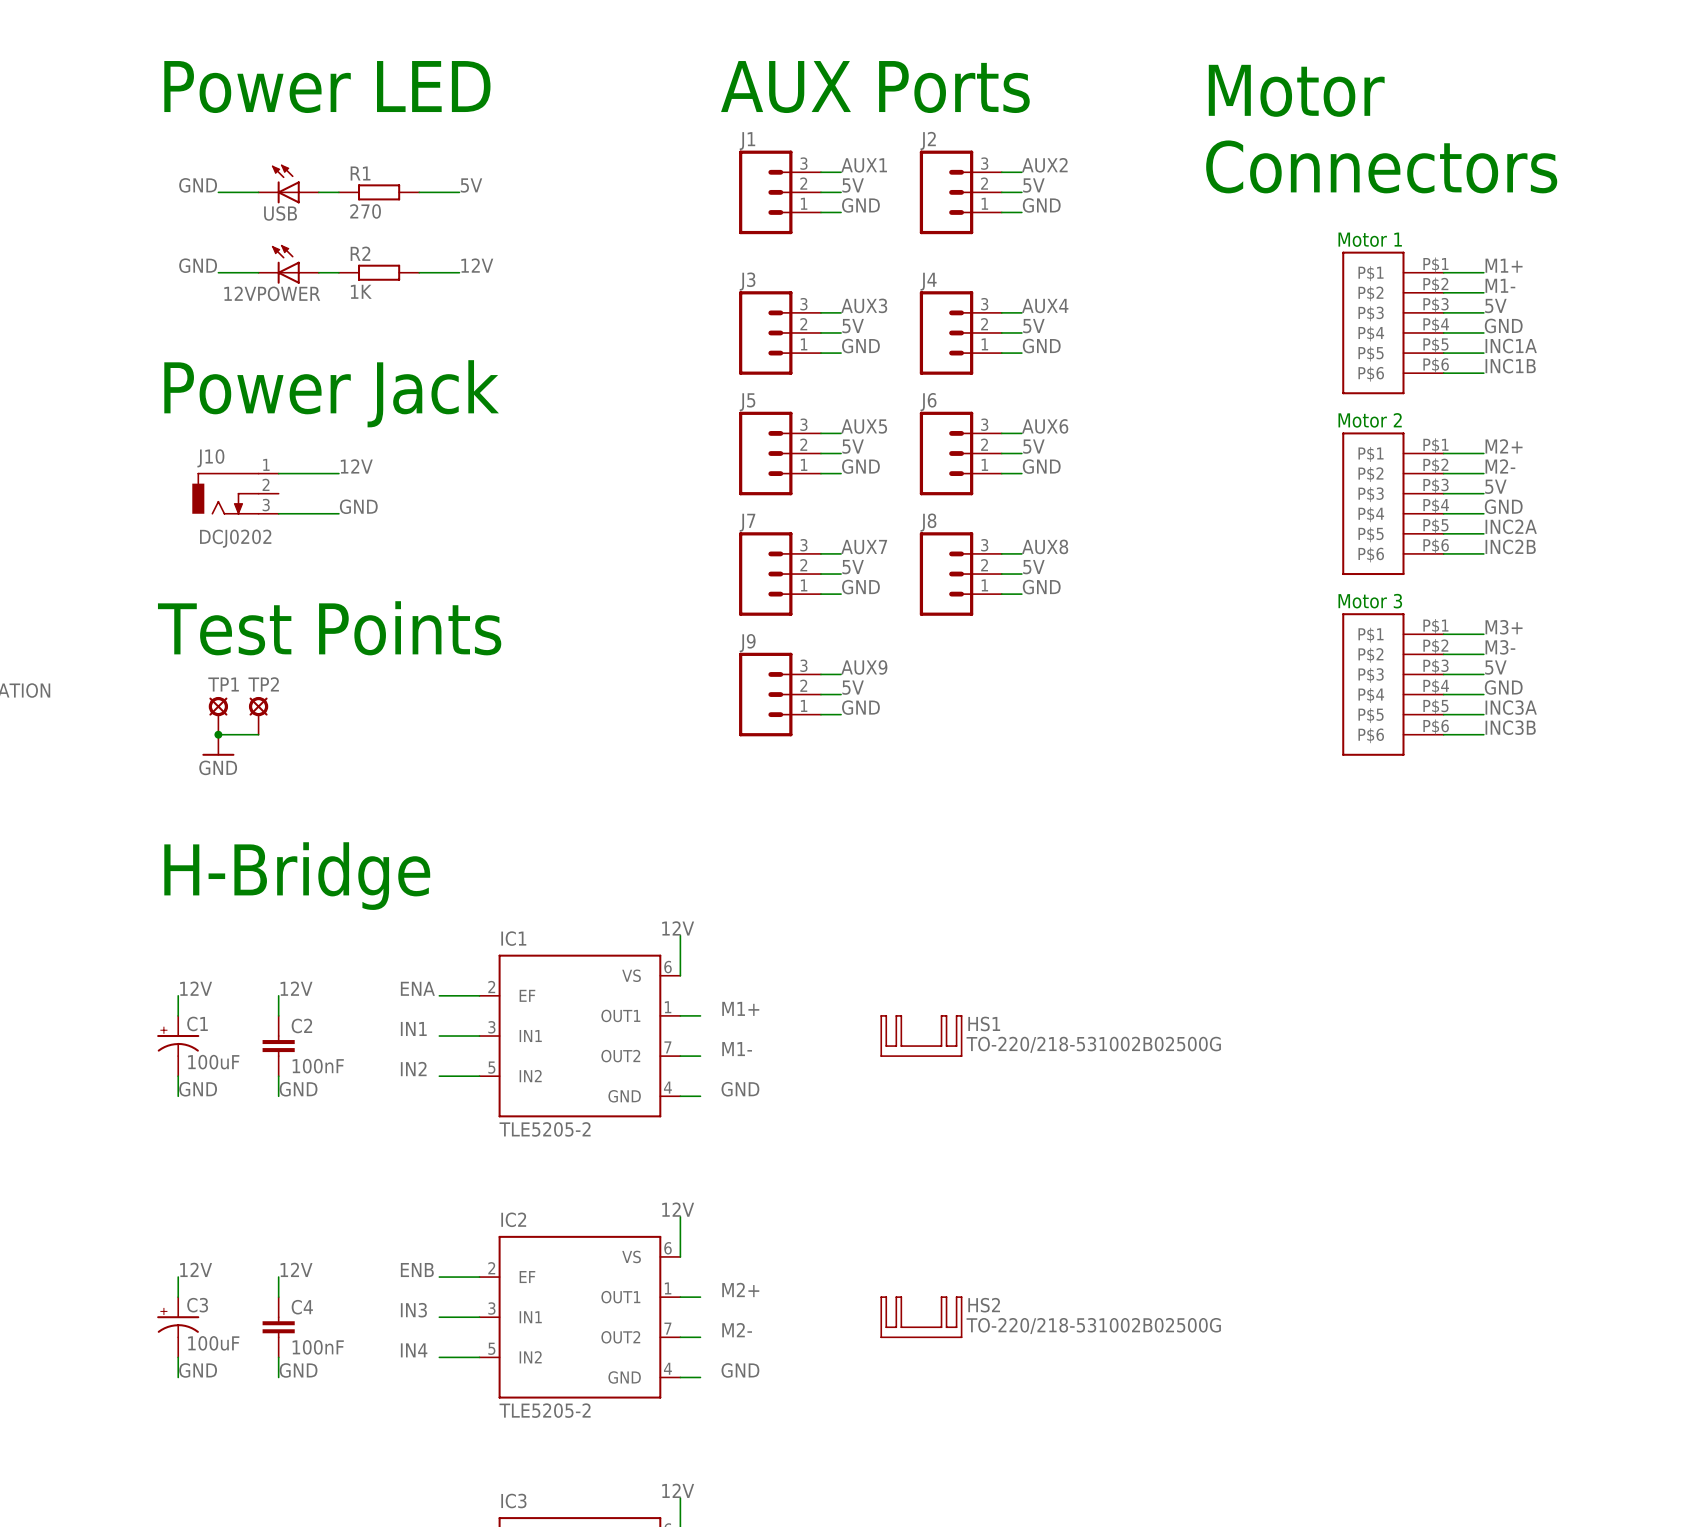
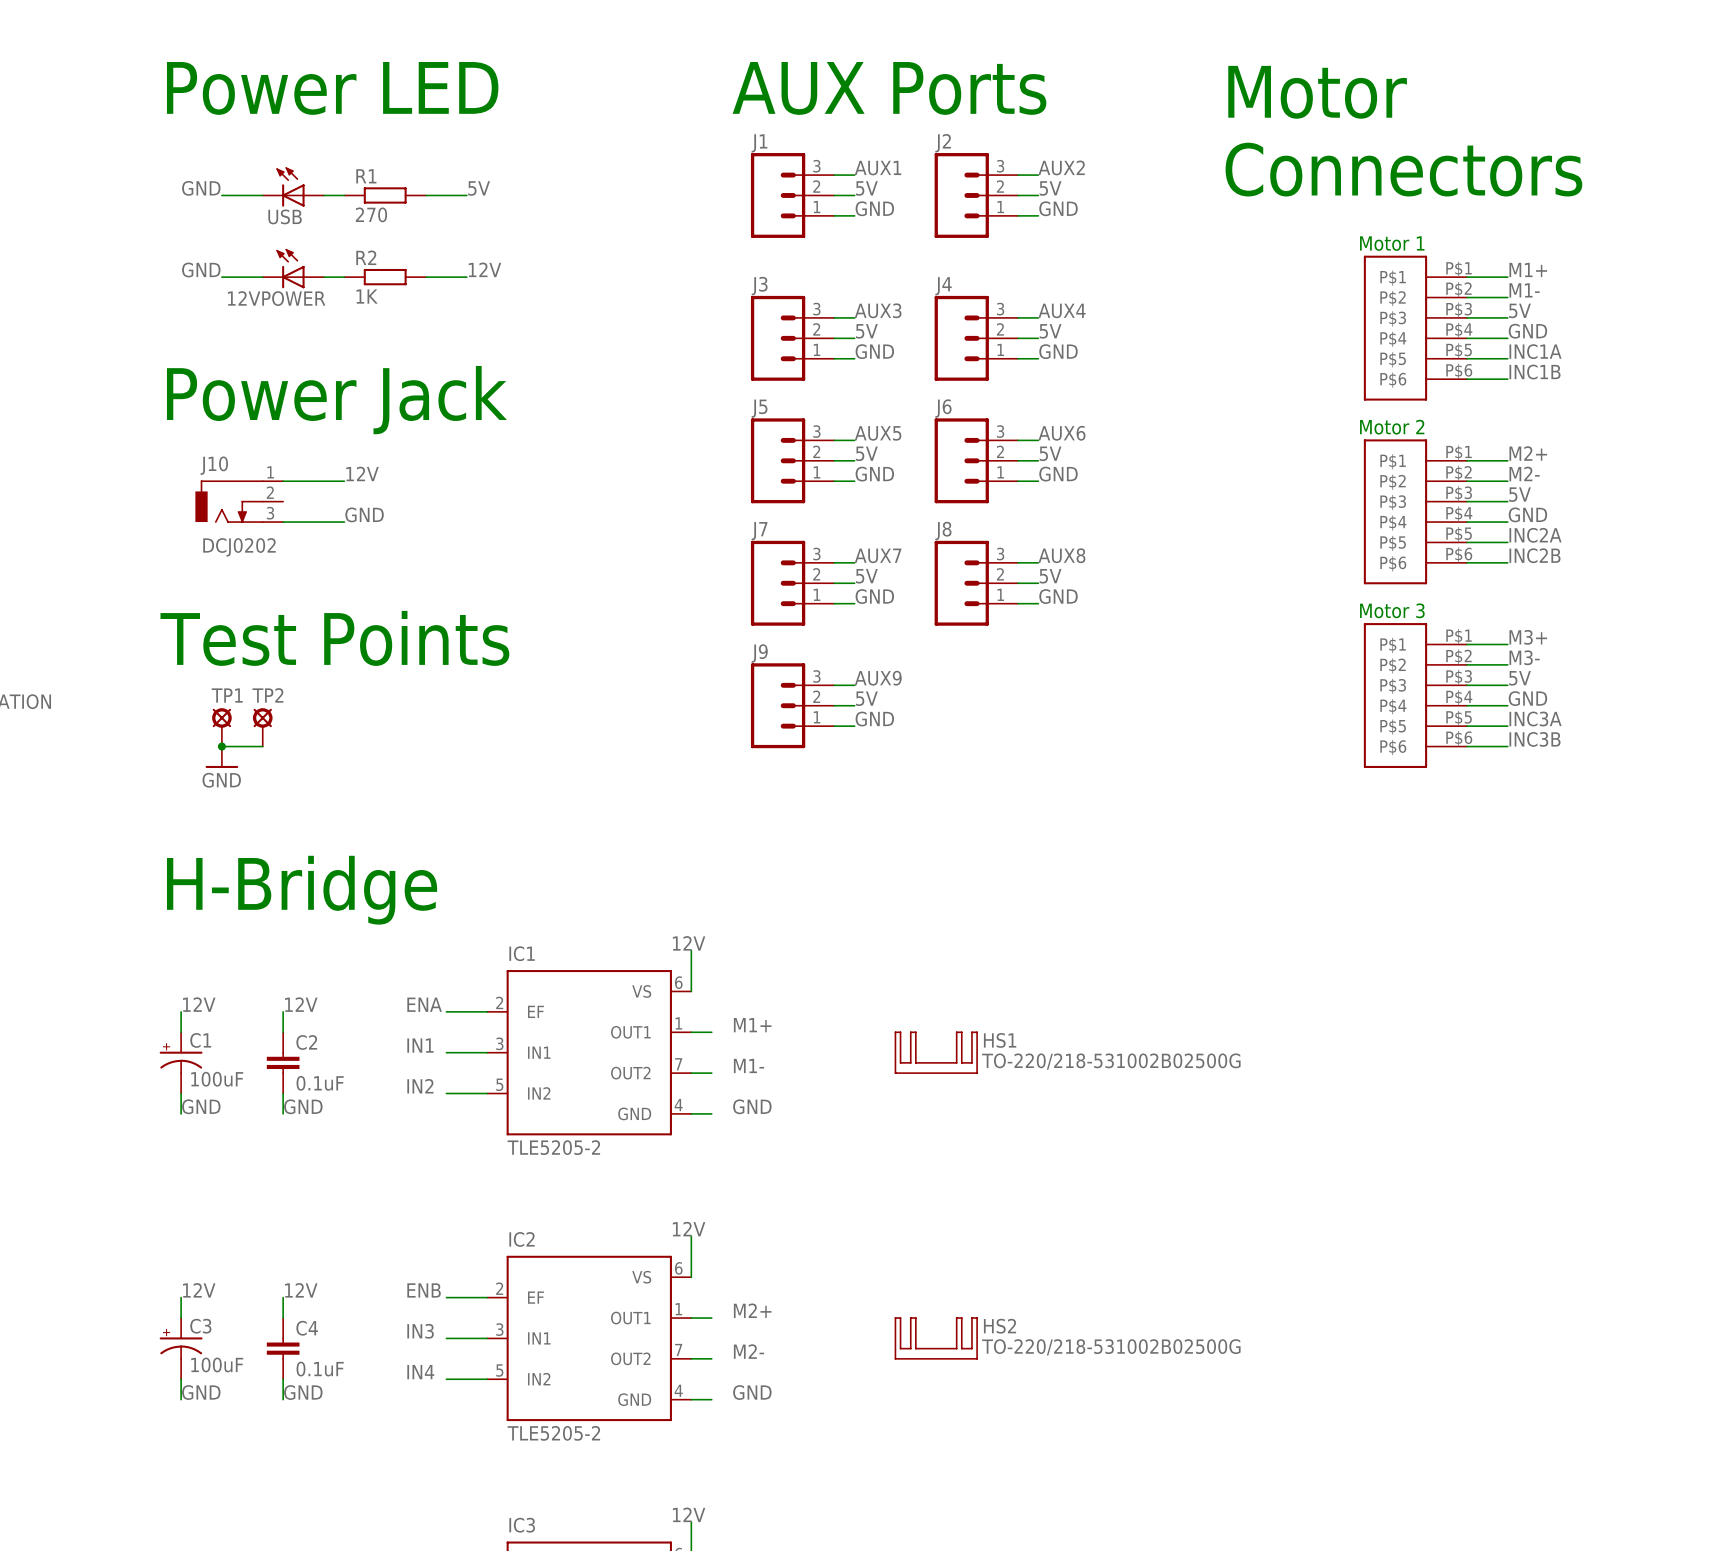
C2 value: 100nF (318, 1066) -> 0.1uF (320, 1083)
C4 value: 100nF (318, 1347) -> 0.1uF (320, 1369)

